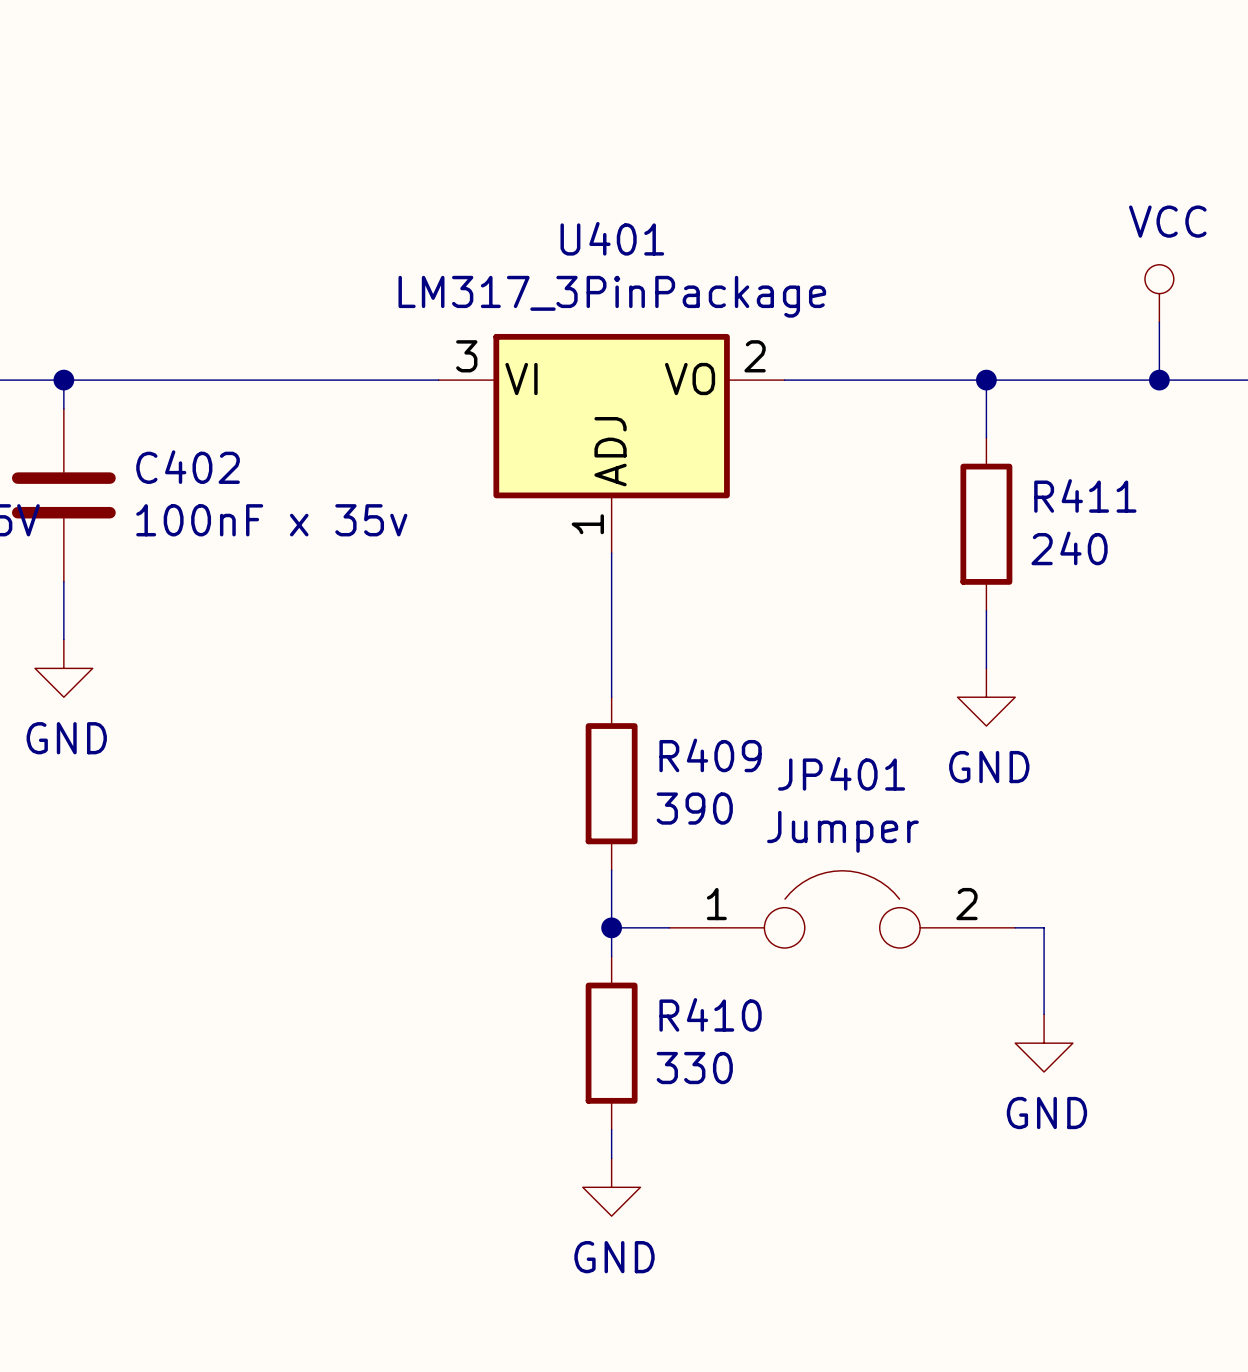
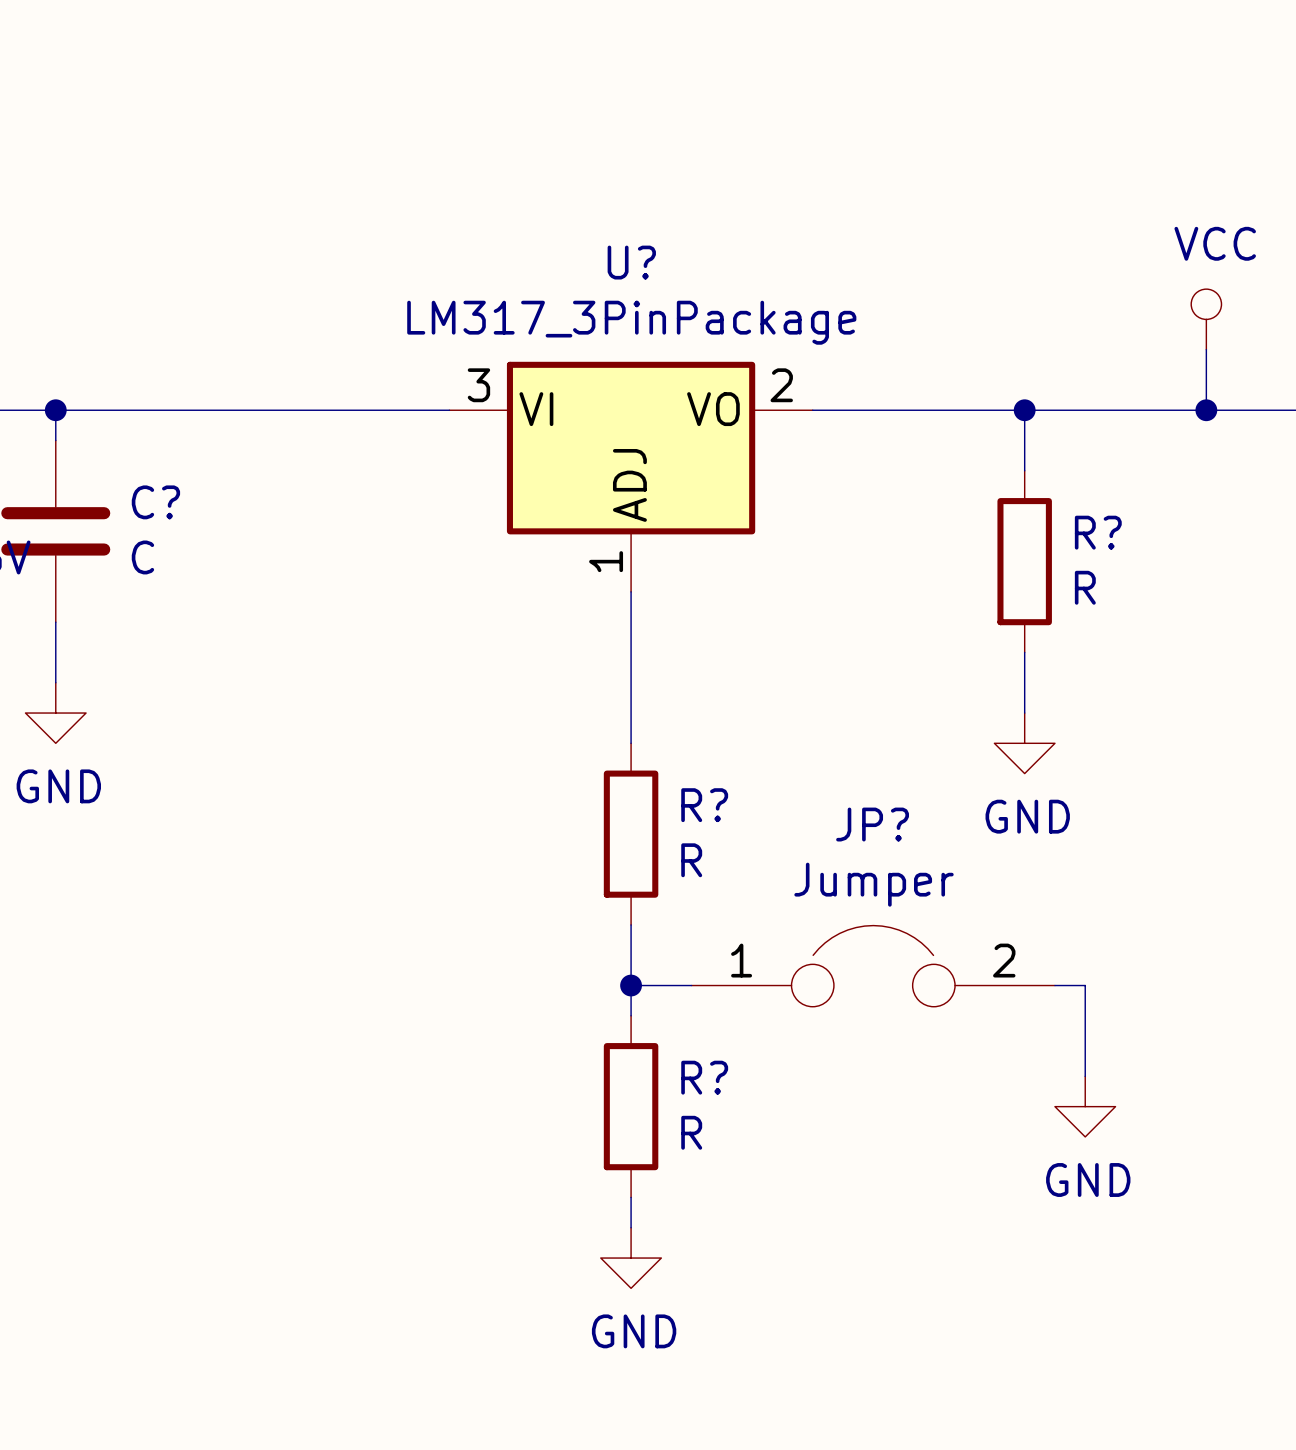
U401 name: U401 (612, 238) -> U? (631, 262)
C402 name: C402 (188, 467) -> C? (155, 502)
R411 name: R411 (1085, 495) -> R? (1098, 532)
C402 value: 100nF x 35v (271, 520) -> C (142, 557)
R411 value: 240 (1069, 548) -> R (1085, 587)
R409 name: R409 (710, 755) -> R? (704, 805)
JP401 name: JP401 (841, 773) -> JP? (872, 824)
R409 value: 390 (694, 808) -> R (691, 860)
R410 name: R410 (710, 1014) -> R? (704, 1077)
R410 value: 330 (694, 1068) -> R (691, 1132)

